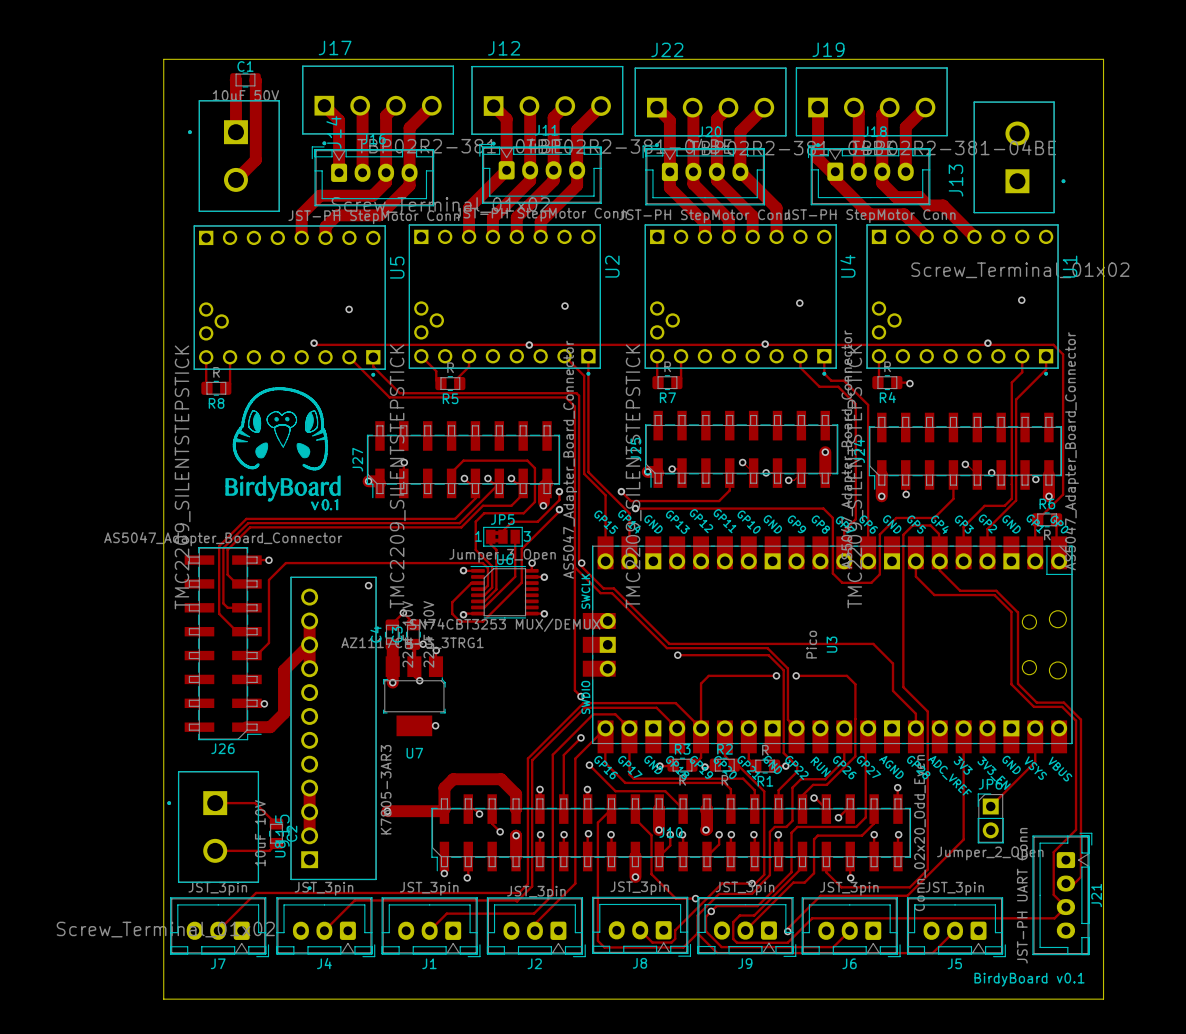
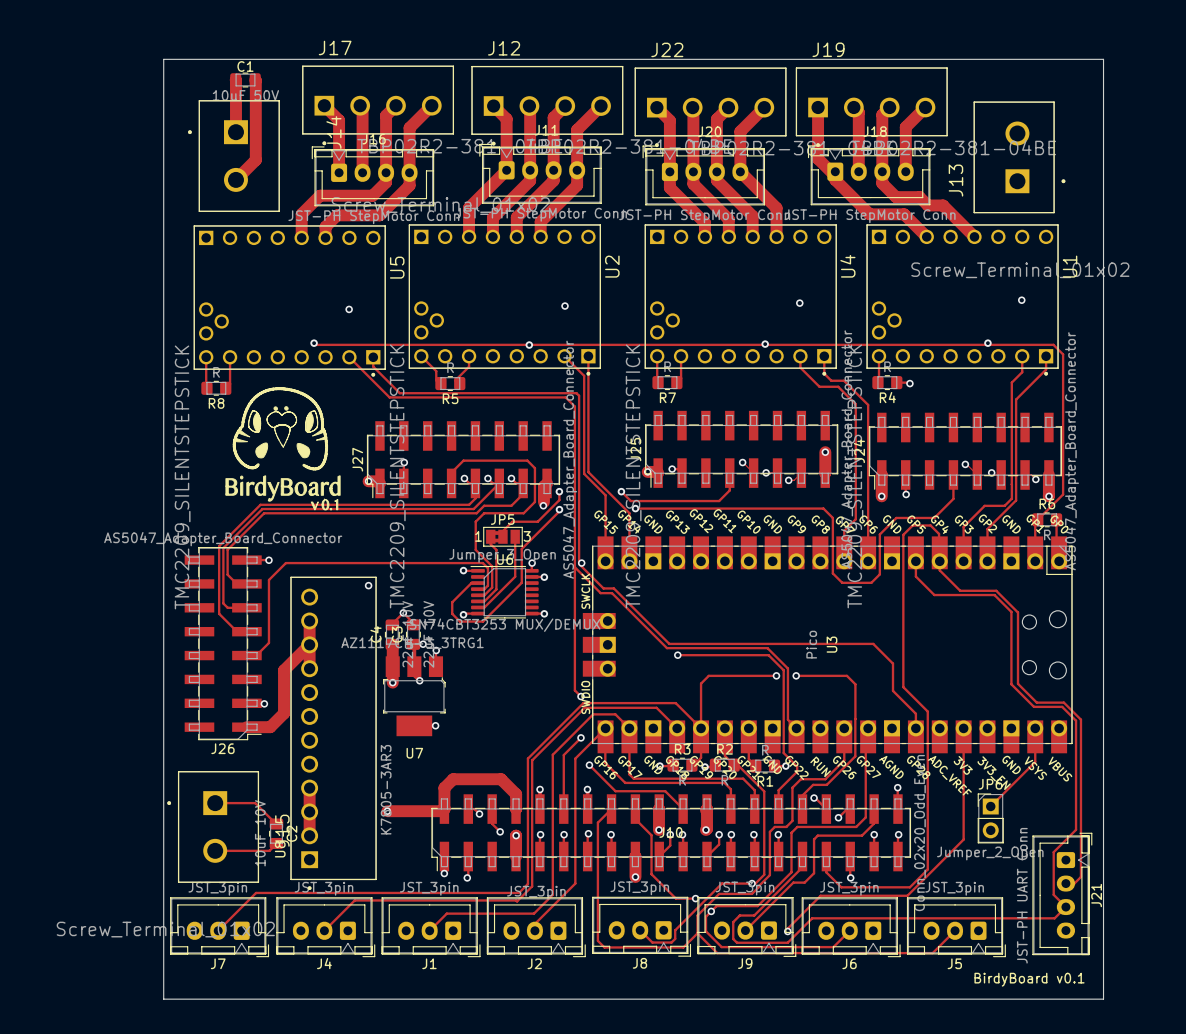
drawing: none -> [273, 406, 289, 411]
drawing: [274, 416, 290, 422] -> none
track: (469, 504) (455, 518) (246, 518) -> (469, 504) (260, 504) (246, 518)
track: (484, 505) (461, 527) (250, 527) -> (484, 505) (476, 513) (264, 513) (250, 527)
track: (473, 509) (459, 523) (248, 523) -> (473, 509) (262, 509) (248, 523)

